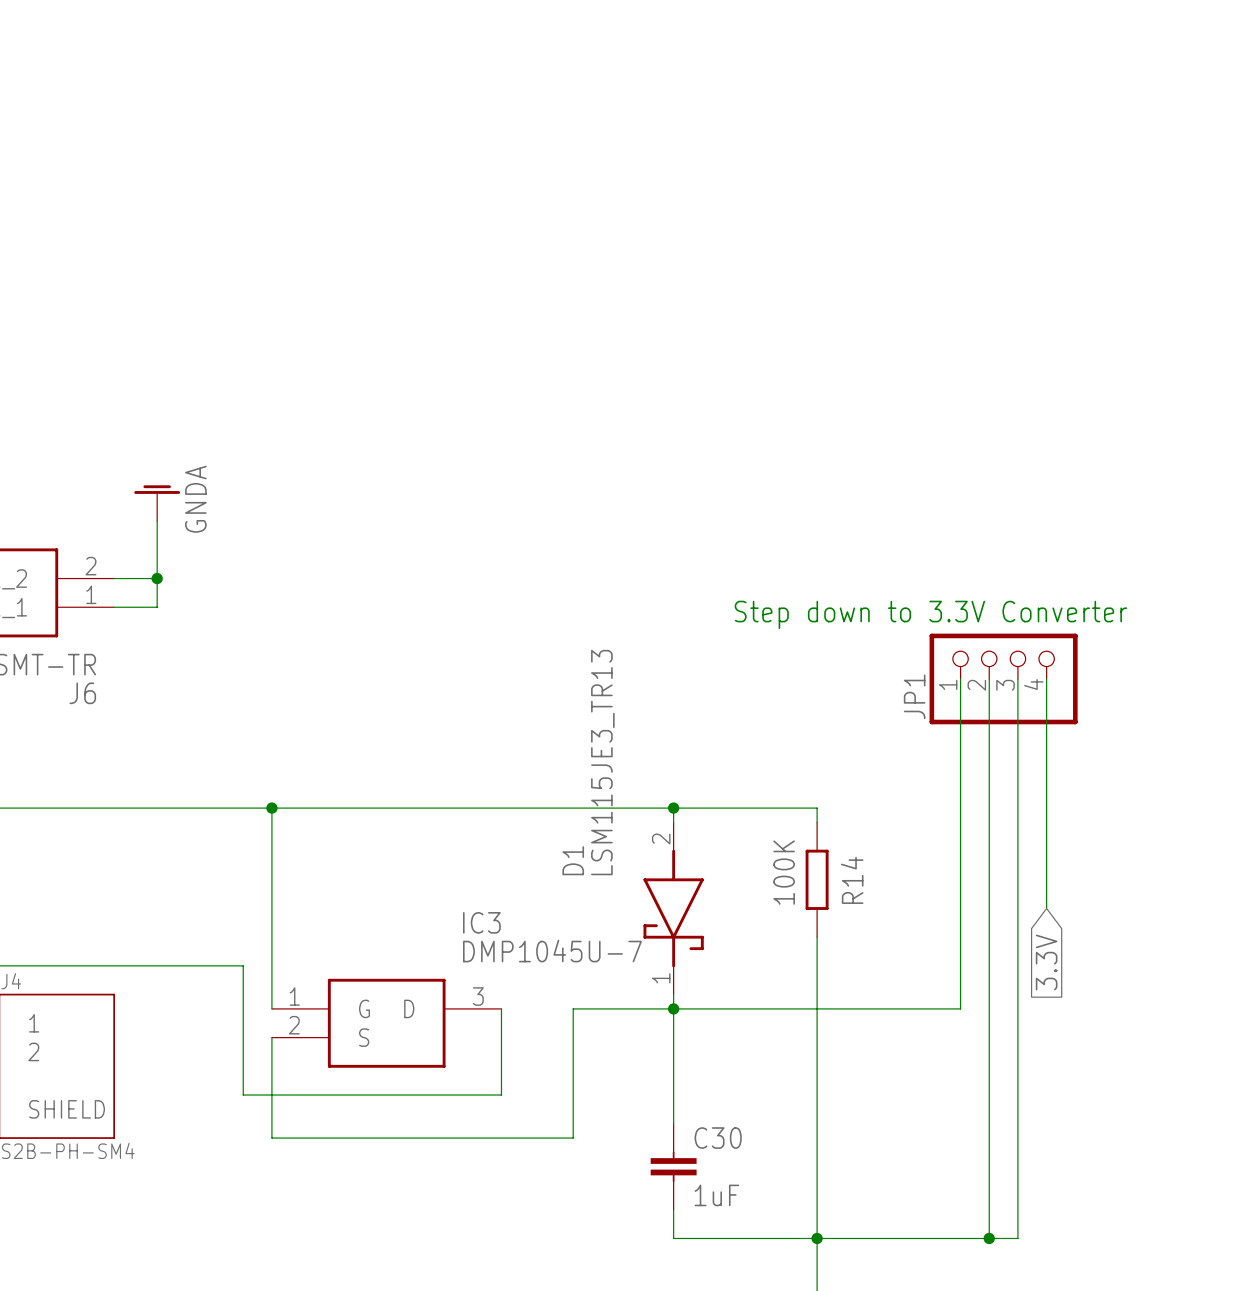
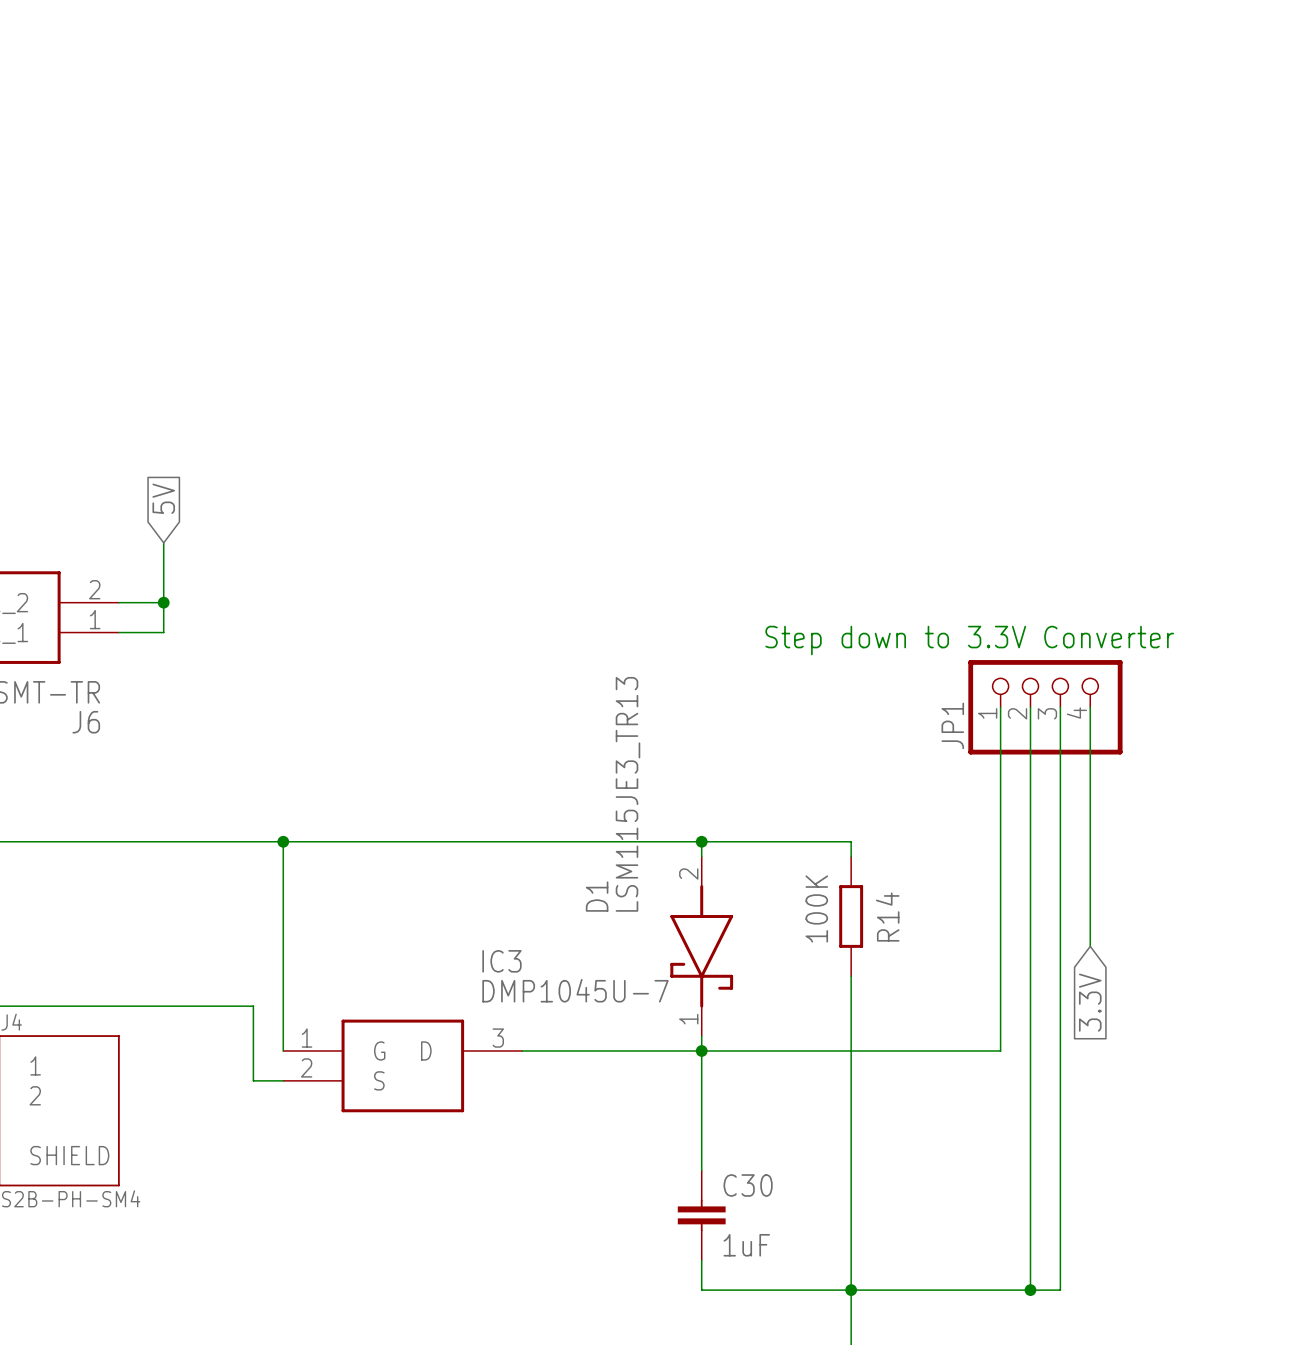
global label: none -> 5V (163, 498)
power symbol: GNDA (157, 503) -> none
wire: (501, 1008) (501, 1095) (243, 1095) (243, 1037) -> (283, 1080) (253, 1080)
wire: (573, 1008) (573, 1138) (271, 1138) (271, 1037) -> (597, 1050) (522, 1050)

